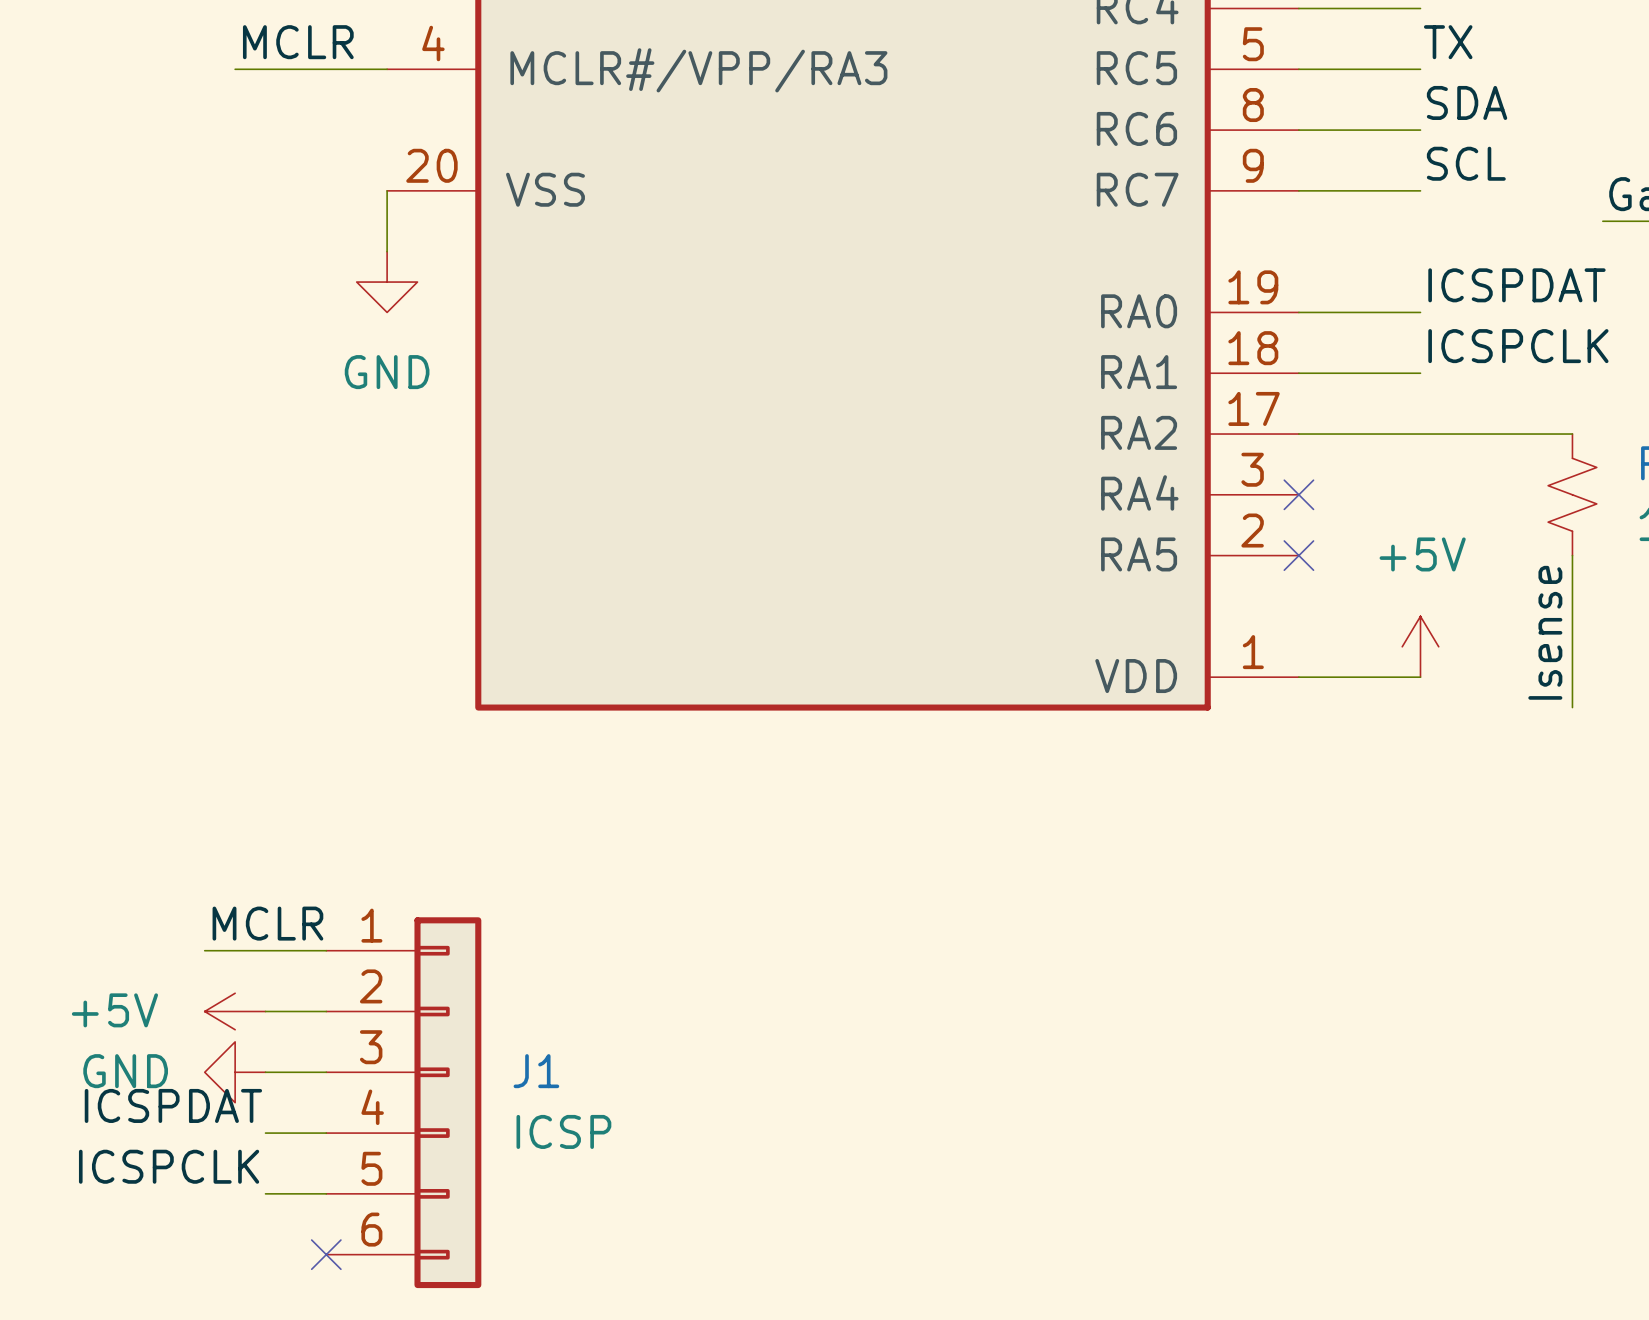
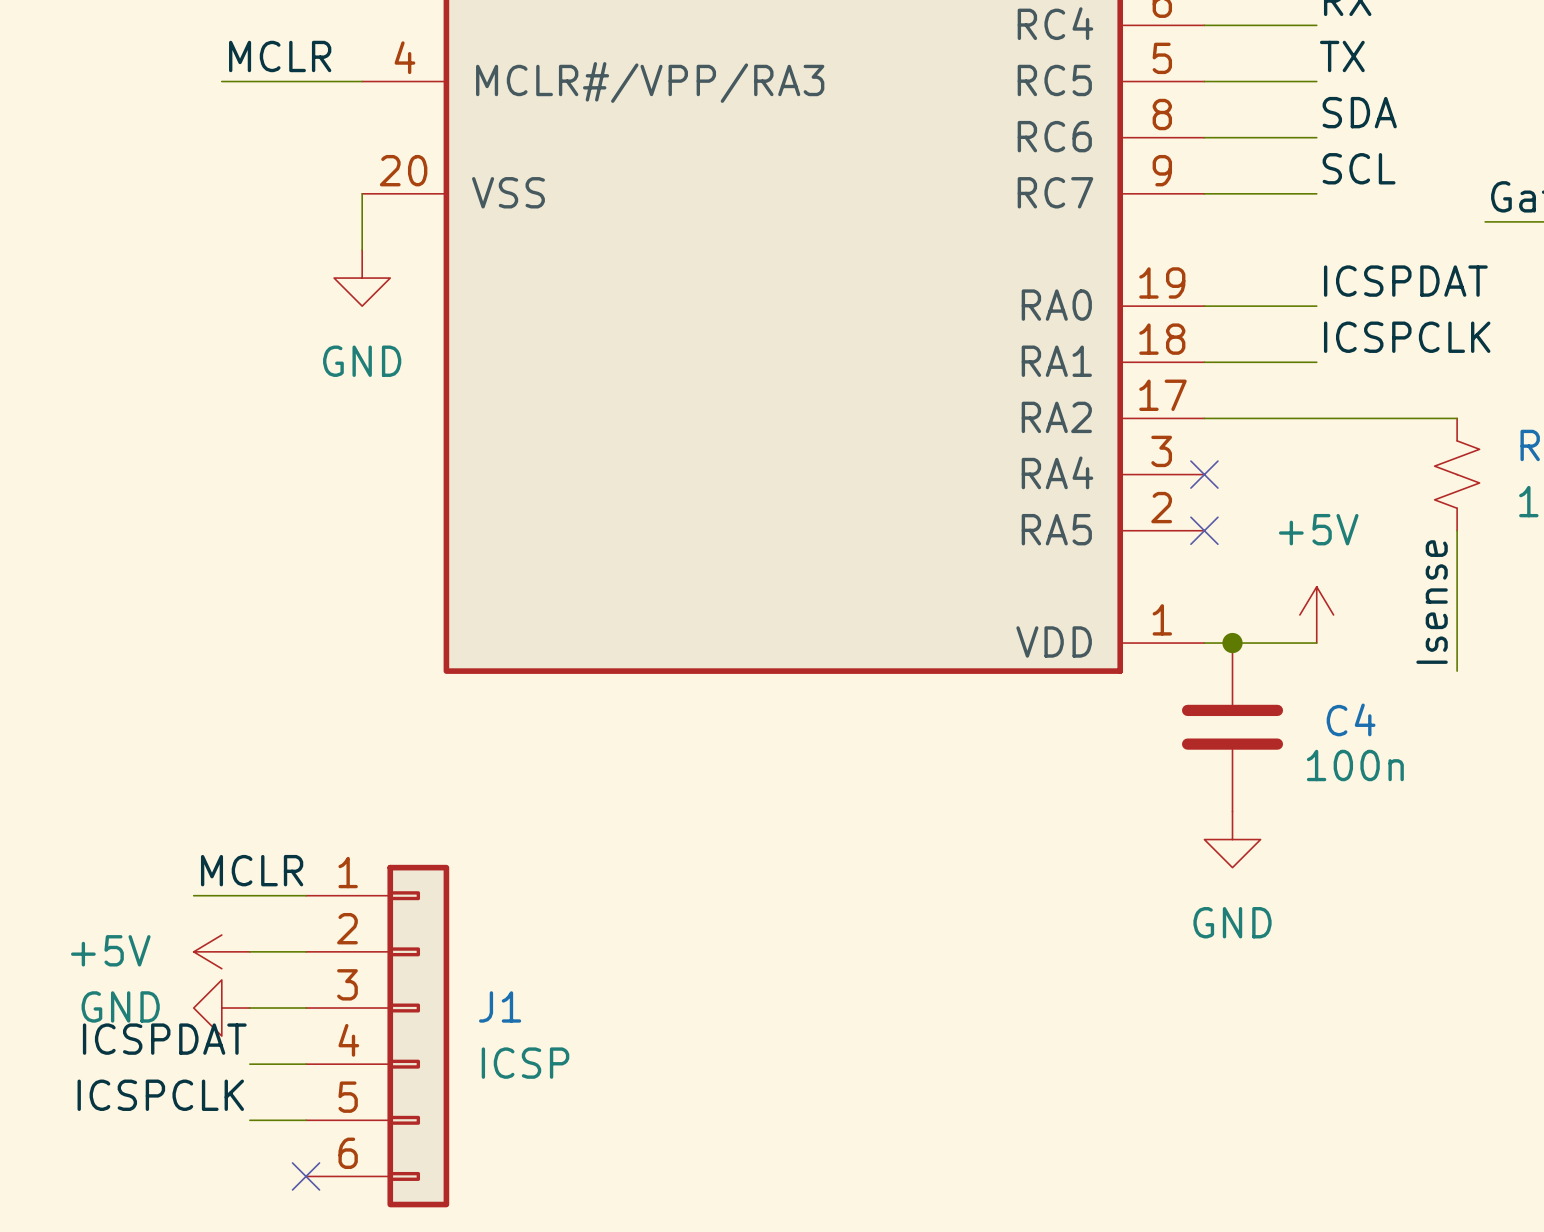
junction: none -> (1232, 643)
C4: none -> 100n (1232, 727)
power symbol: none -> GND (1232, 839)

